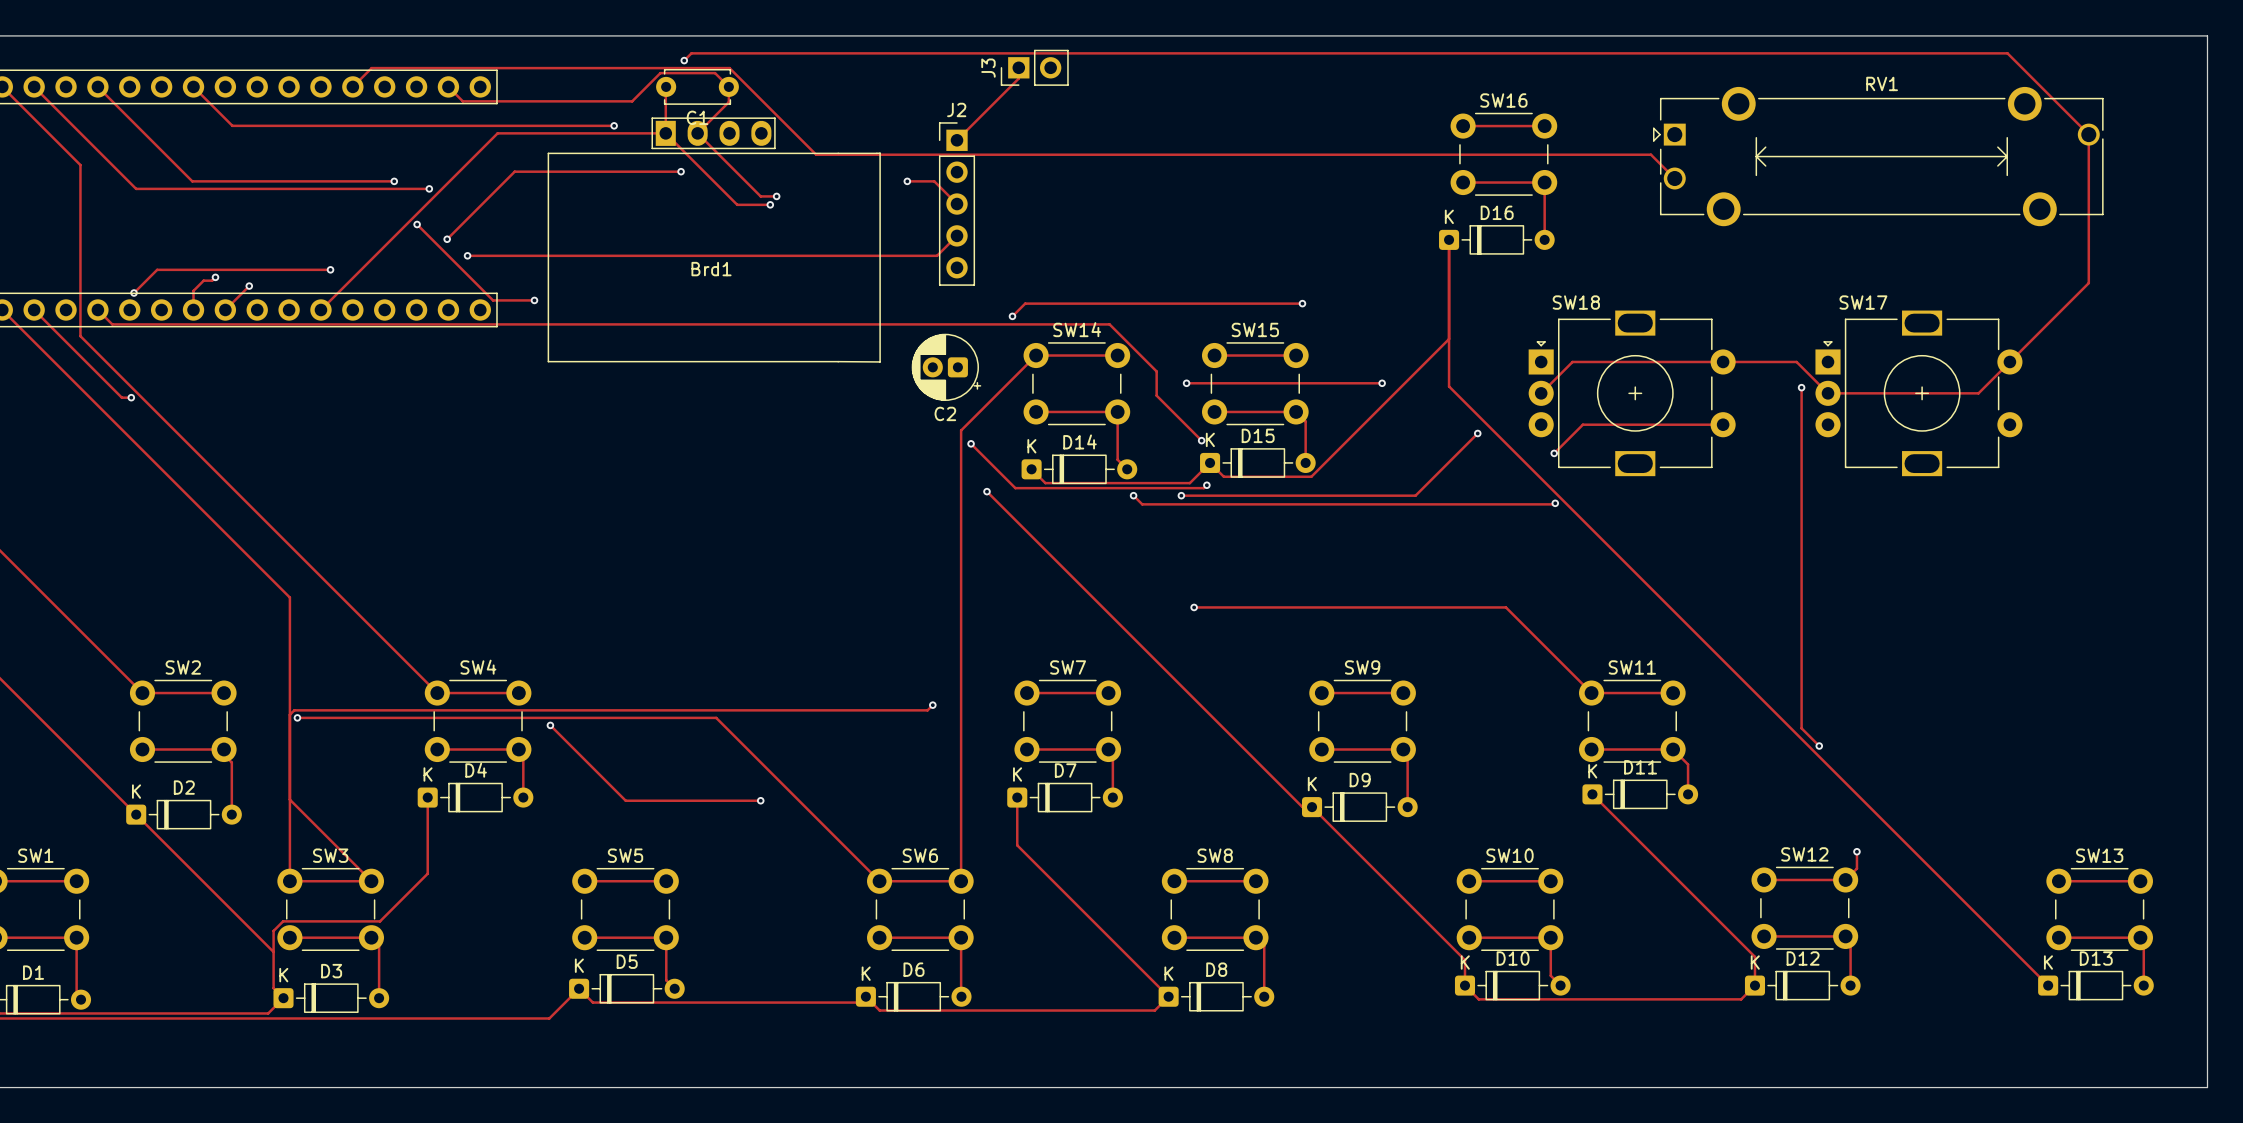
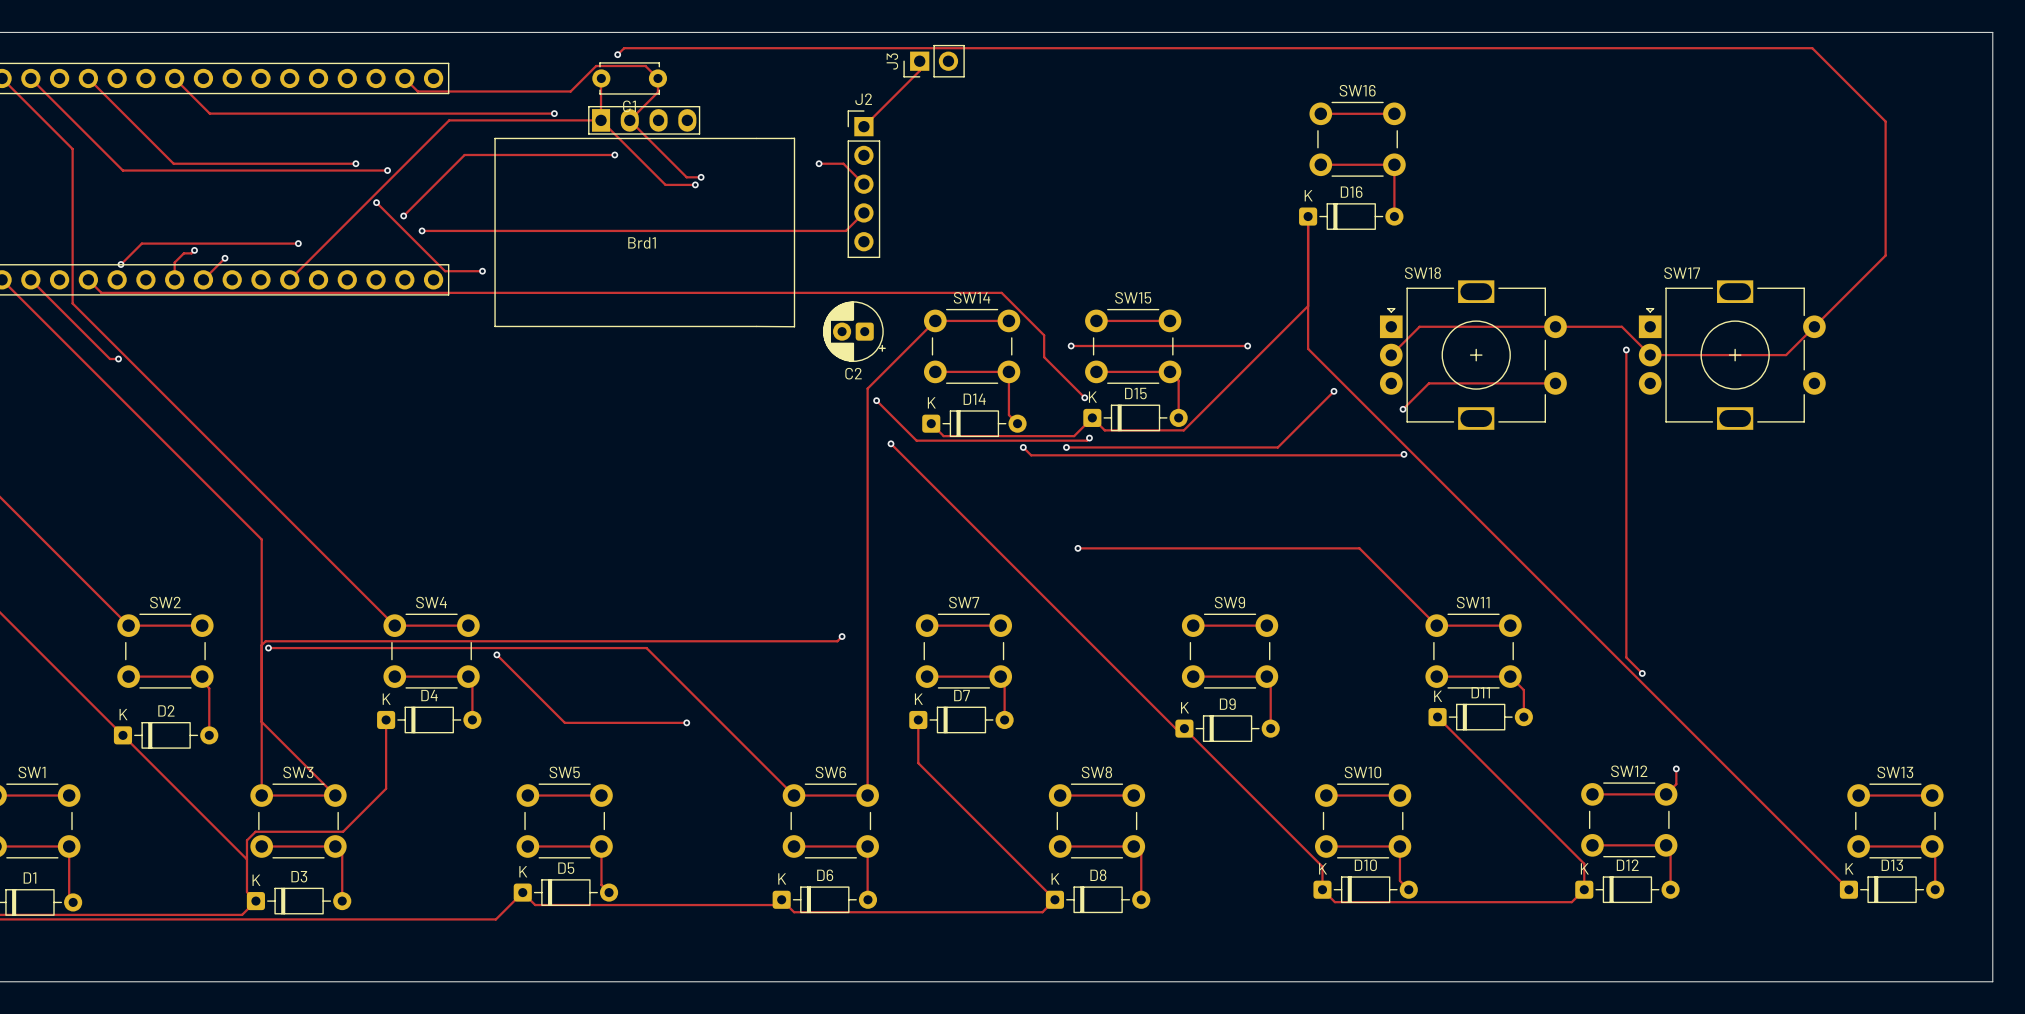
track: (352, 86) (371, 68) (729, 68) (816, 154) (1650, 154) (1674, 178) -> none
RV1: (1878, 156) -> none
track: (1302, 303) (1025, 303) (1012, 316) -> none
via: (1302, 303) -> none
via: (1012, 316) -> none

